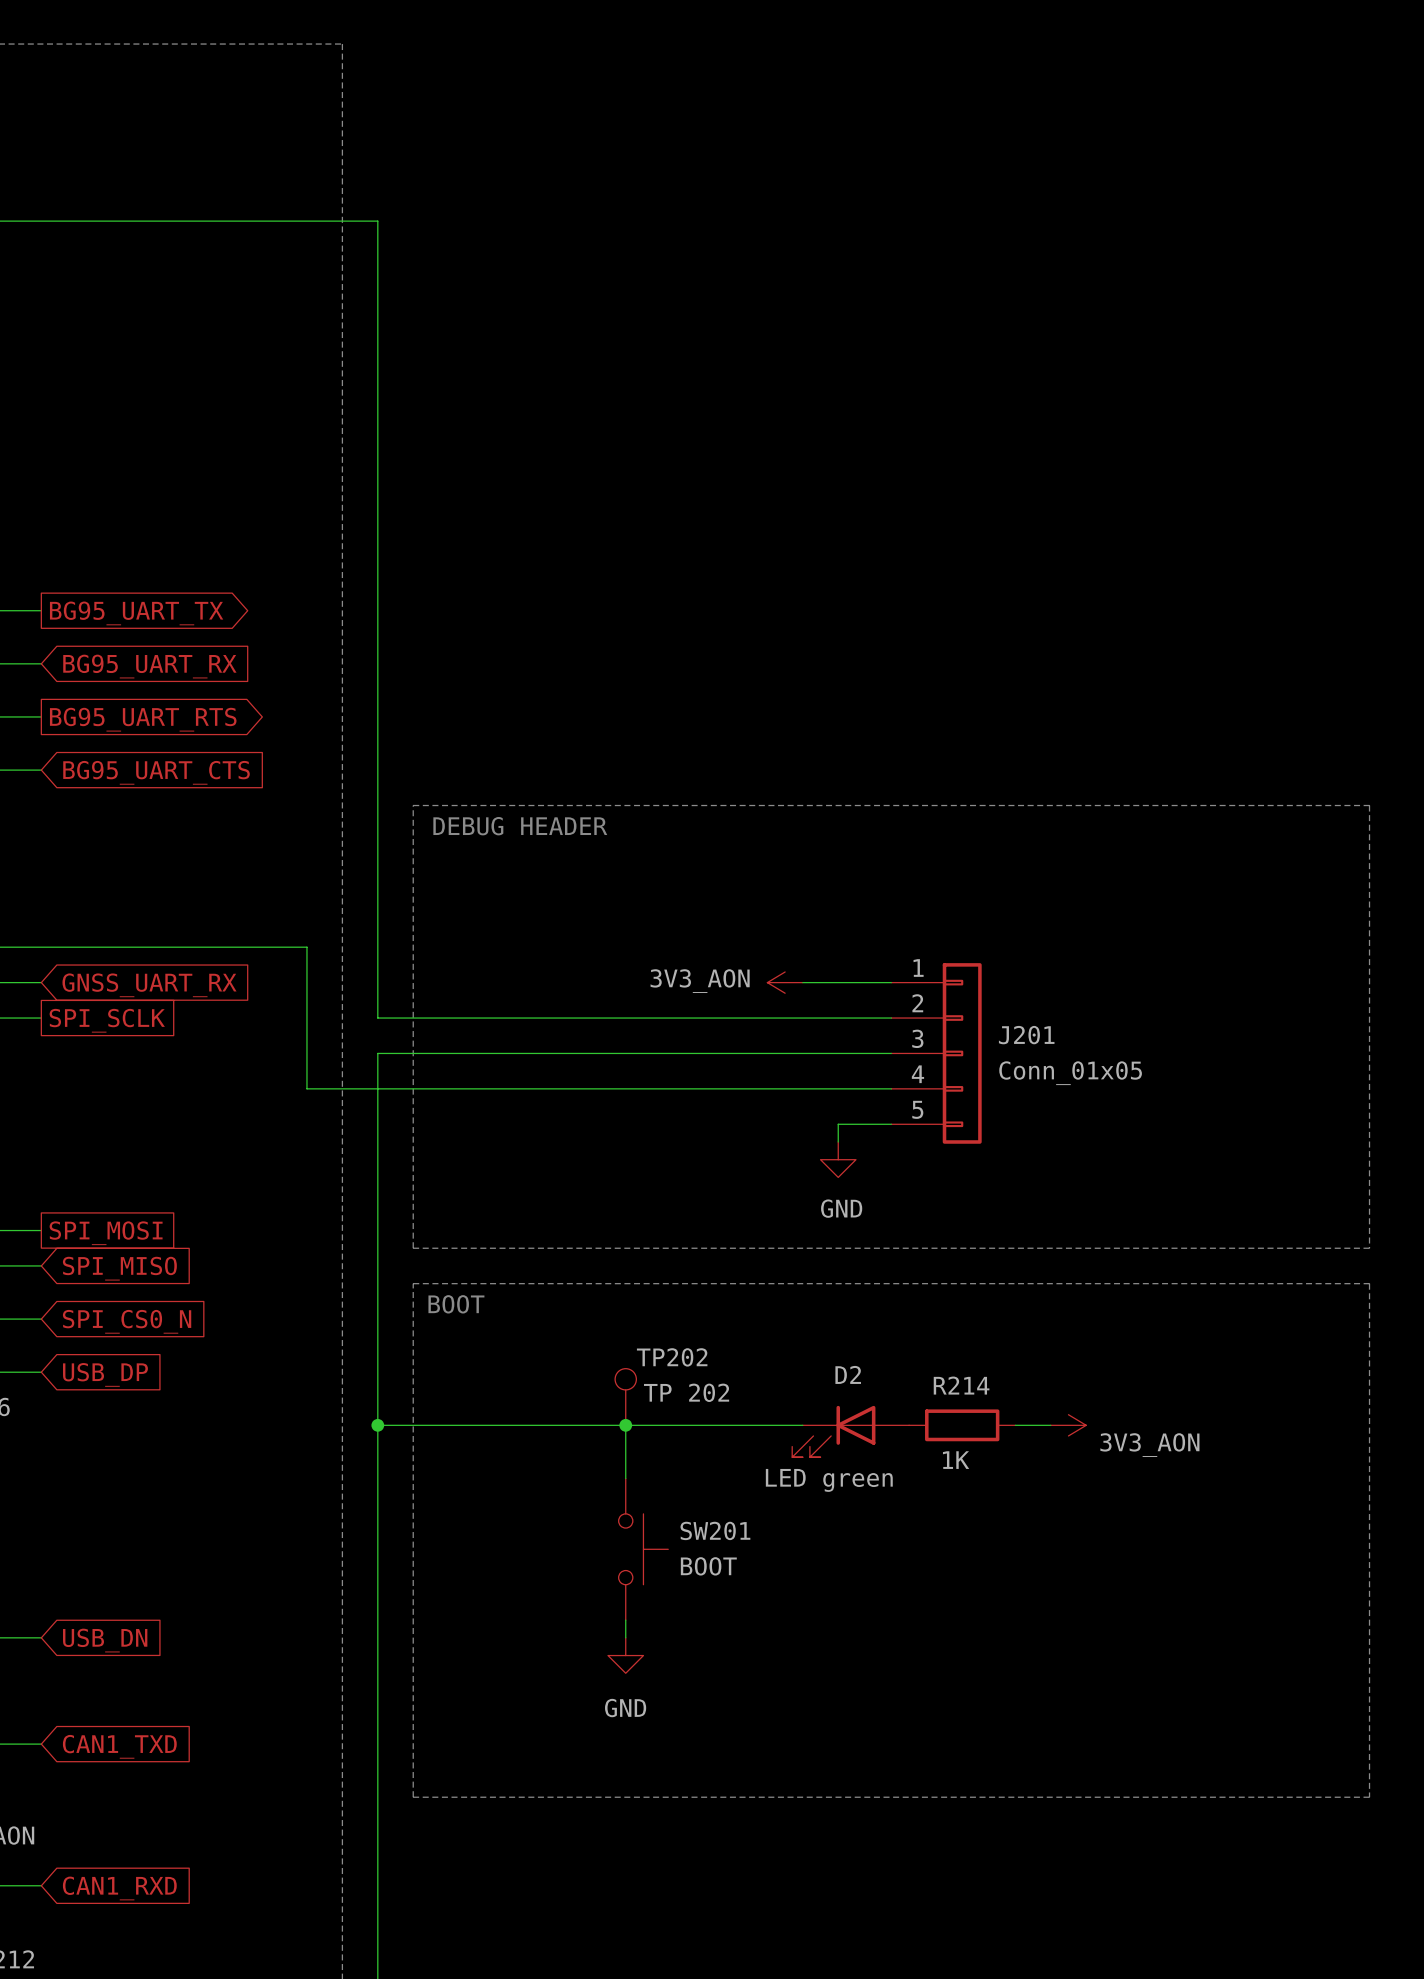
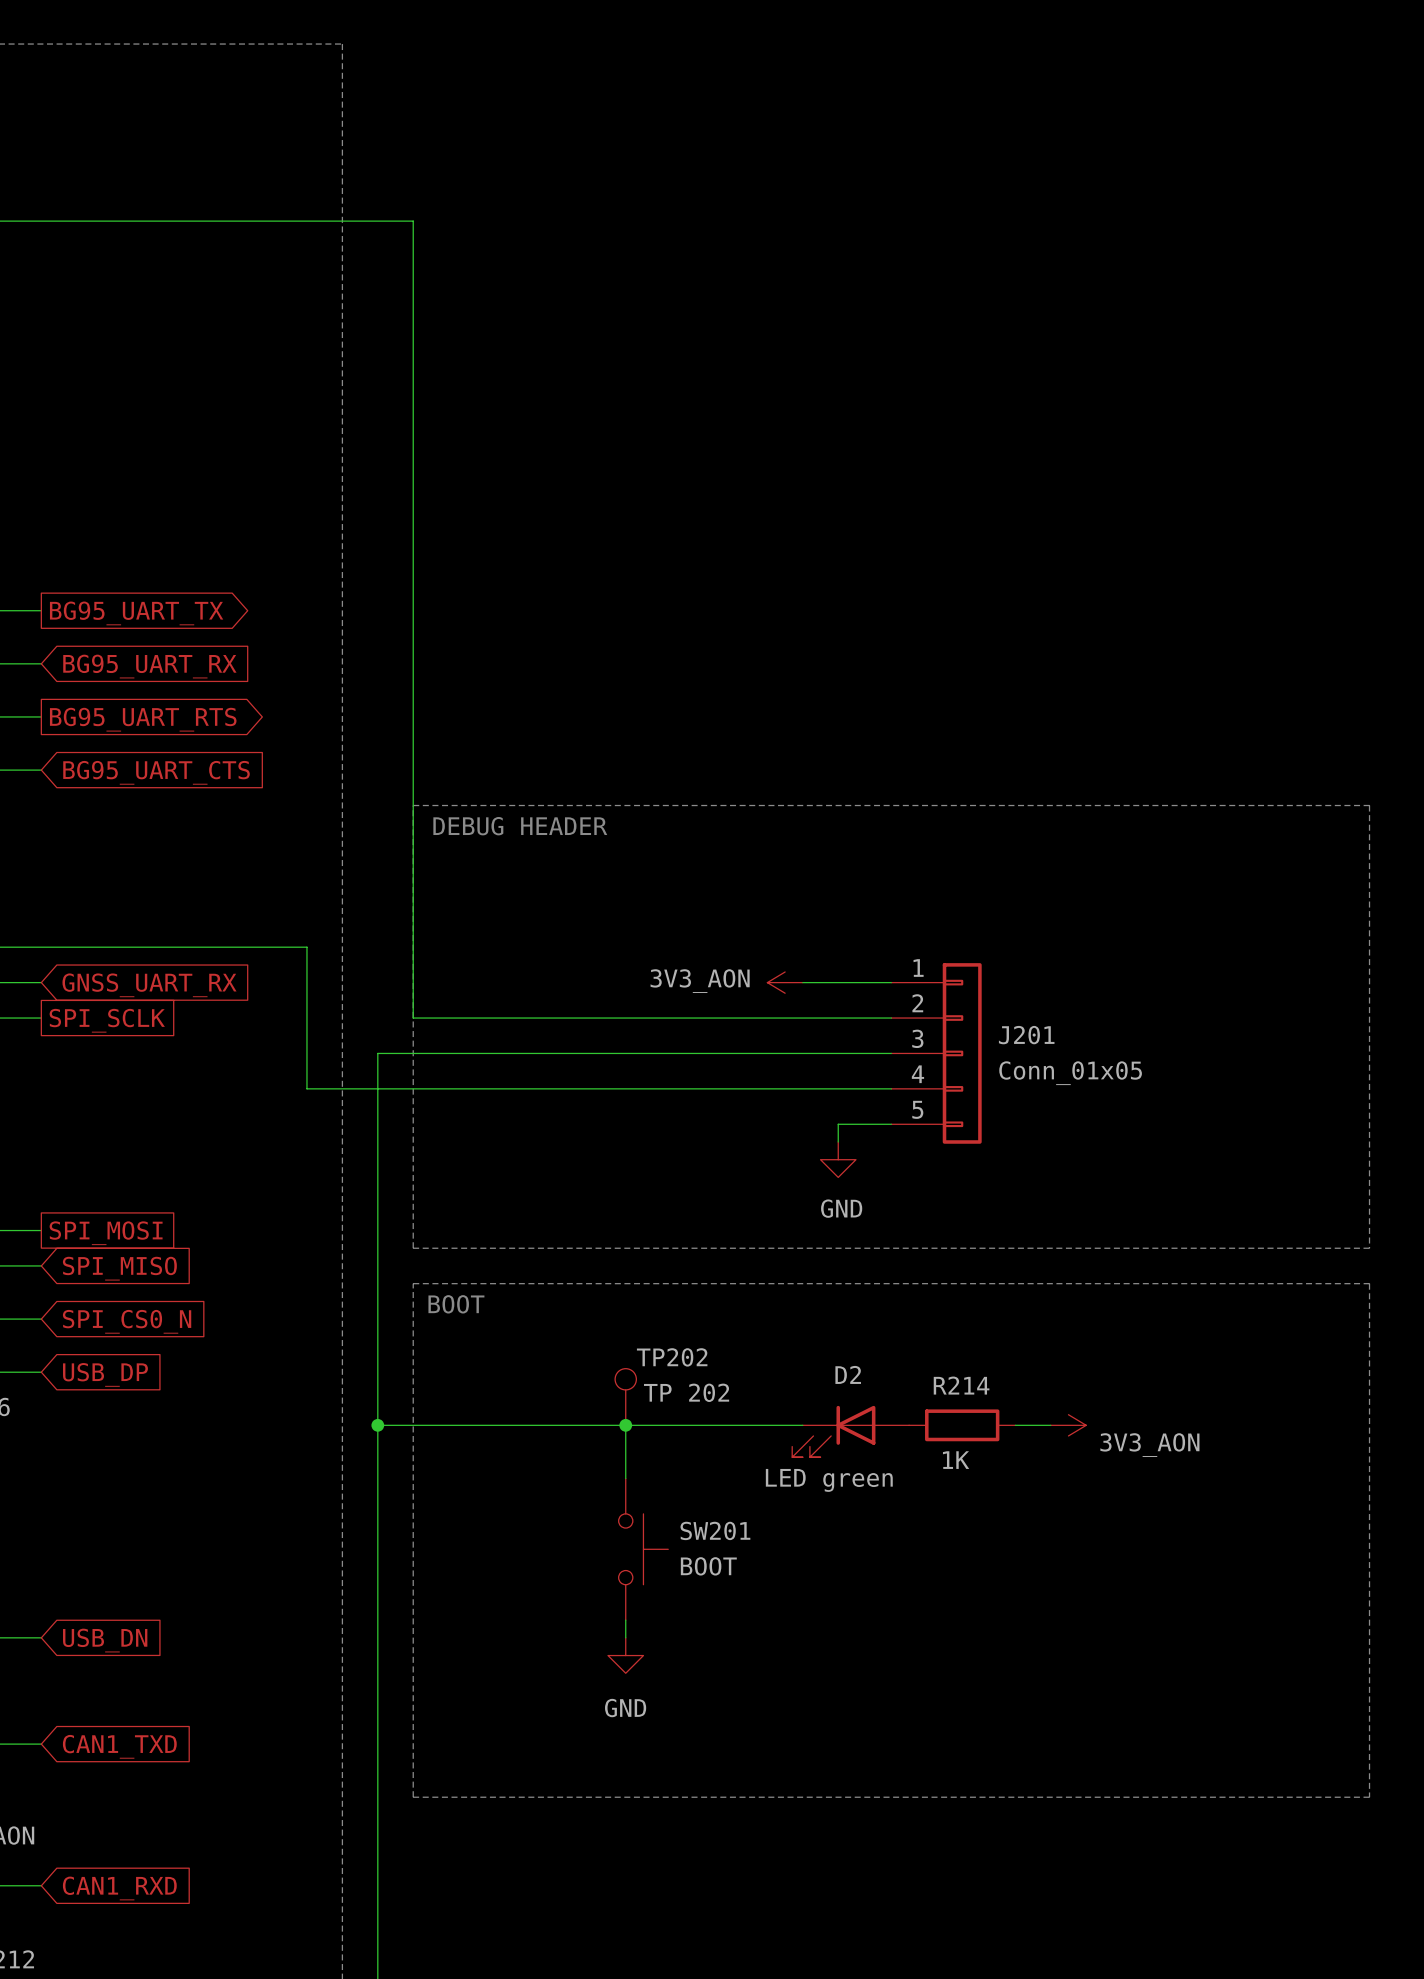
wire: (377, 221) (377, 1018) (413, 1018) -> (377, 221) (413, 221) (413, 1018)

